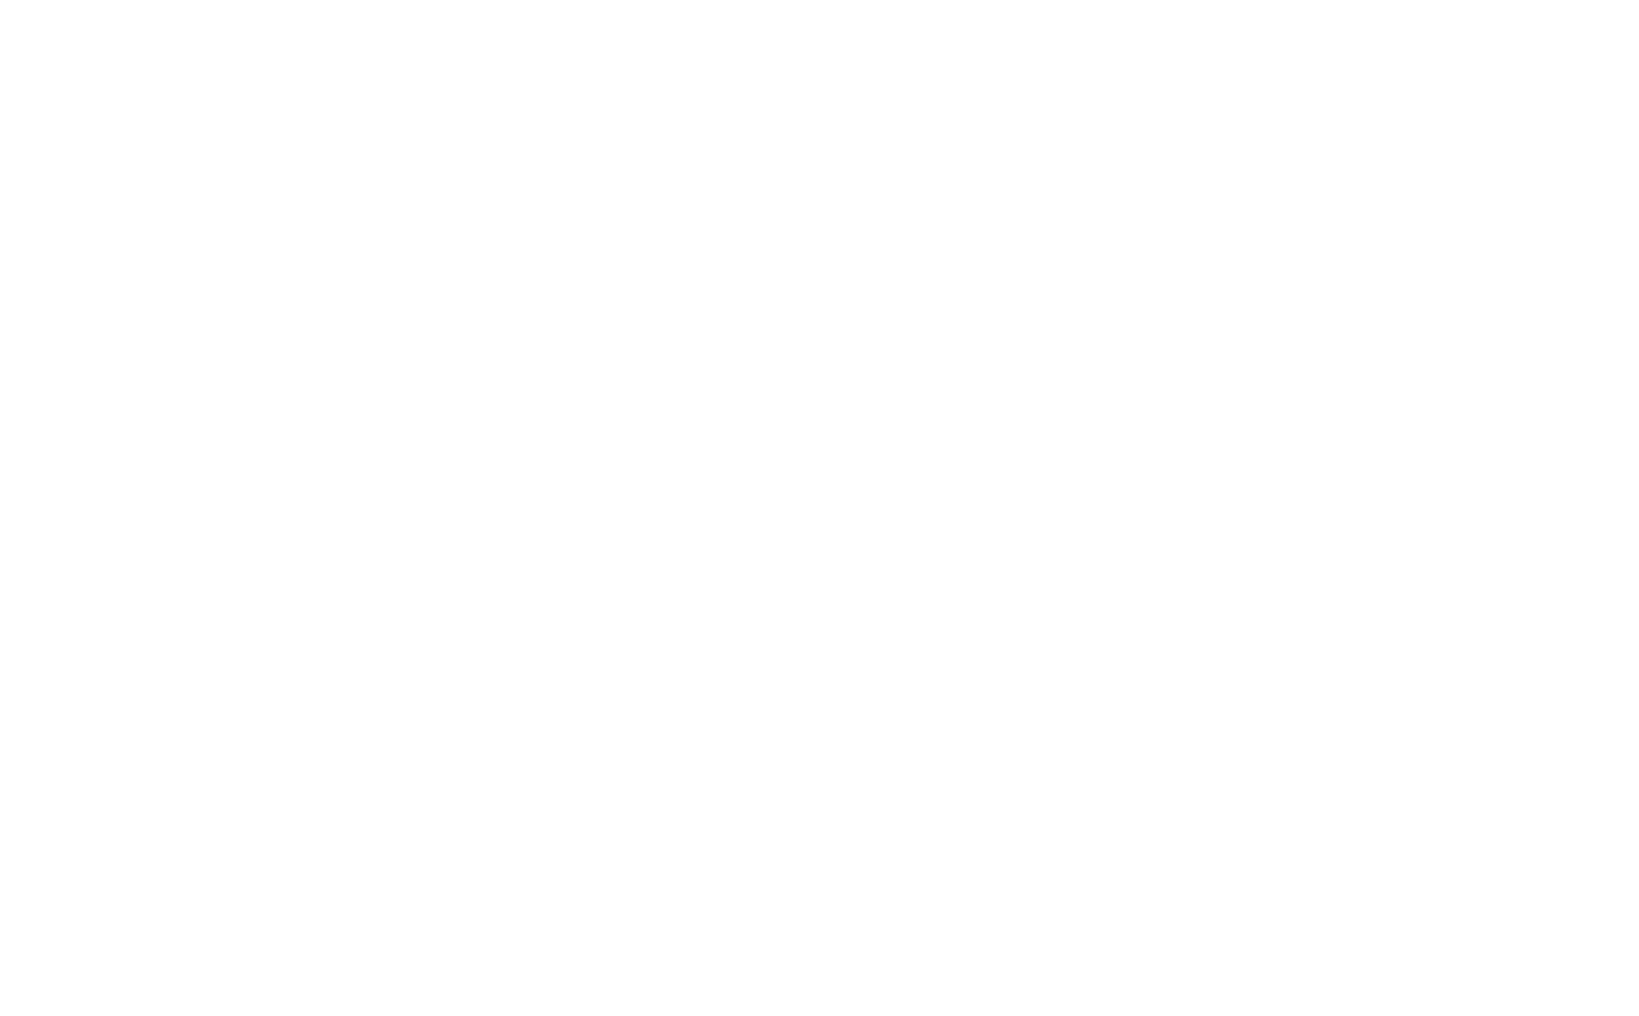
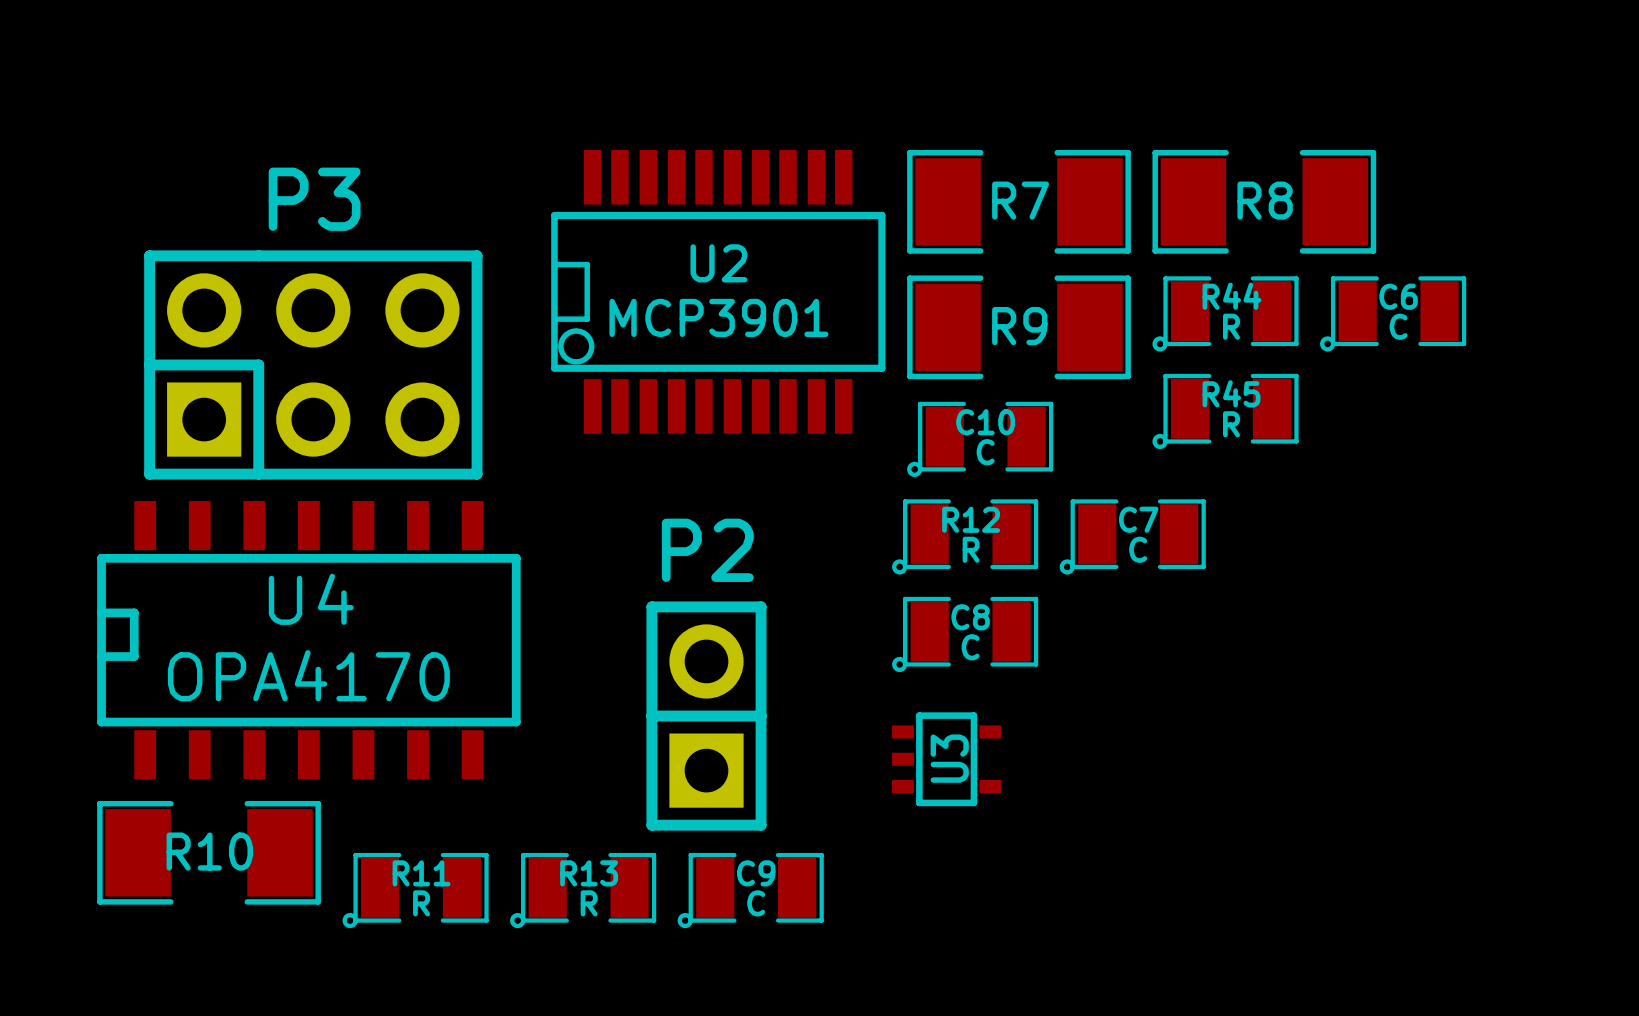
R7: none -> (1018, 201)
R8: none -> (1264, 201)
U2: none -> MCP3901 (718, 291)
R44: none -> R (1225, 313)
C6: none -> C (1393, 313)
R9: none -> (1018, 327)
P3: none -> (313, 364)
R45: none -> R (1225, 411)
C10: none -> C (980, 439)
R12: none -> R (965, 536)
C7: none -> C (1132, 536)
C8: none -> C (965, 634)
U4: none -> OPA4170 (308, 640)
P2: none -> (706, 716)
U3: none -> (946, 759)
R10: none -> (209, 852)
R11: none -> R (415, 890)
R13: none -> R (583, 890)
C9: none -> C (750, 890)

